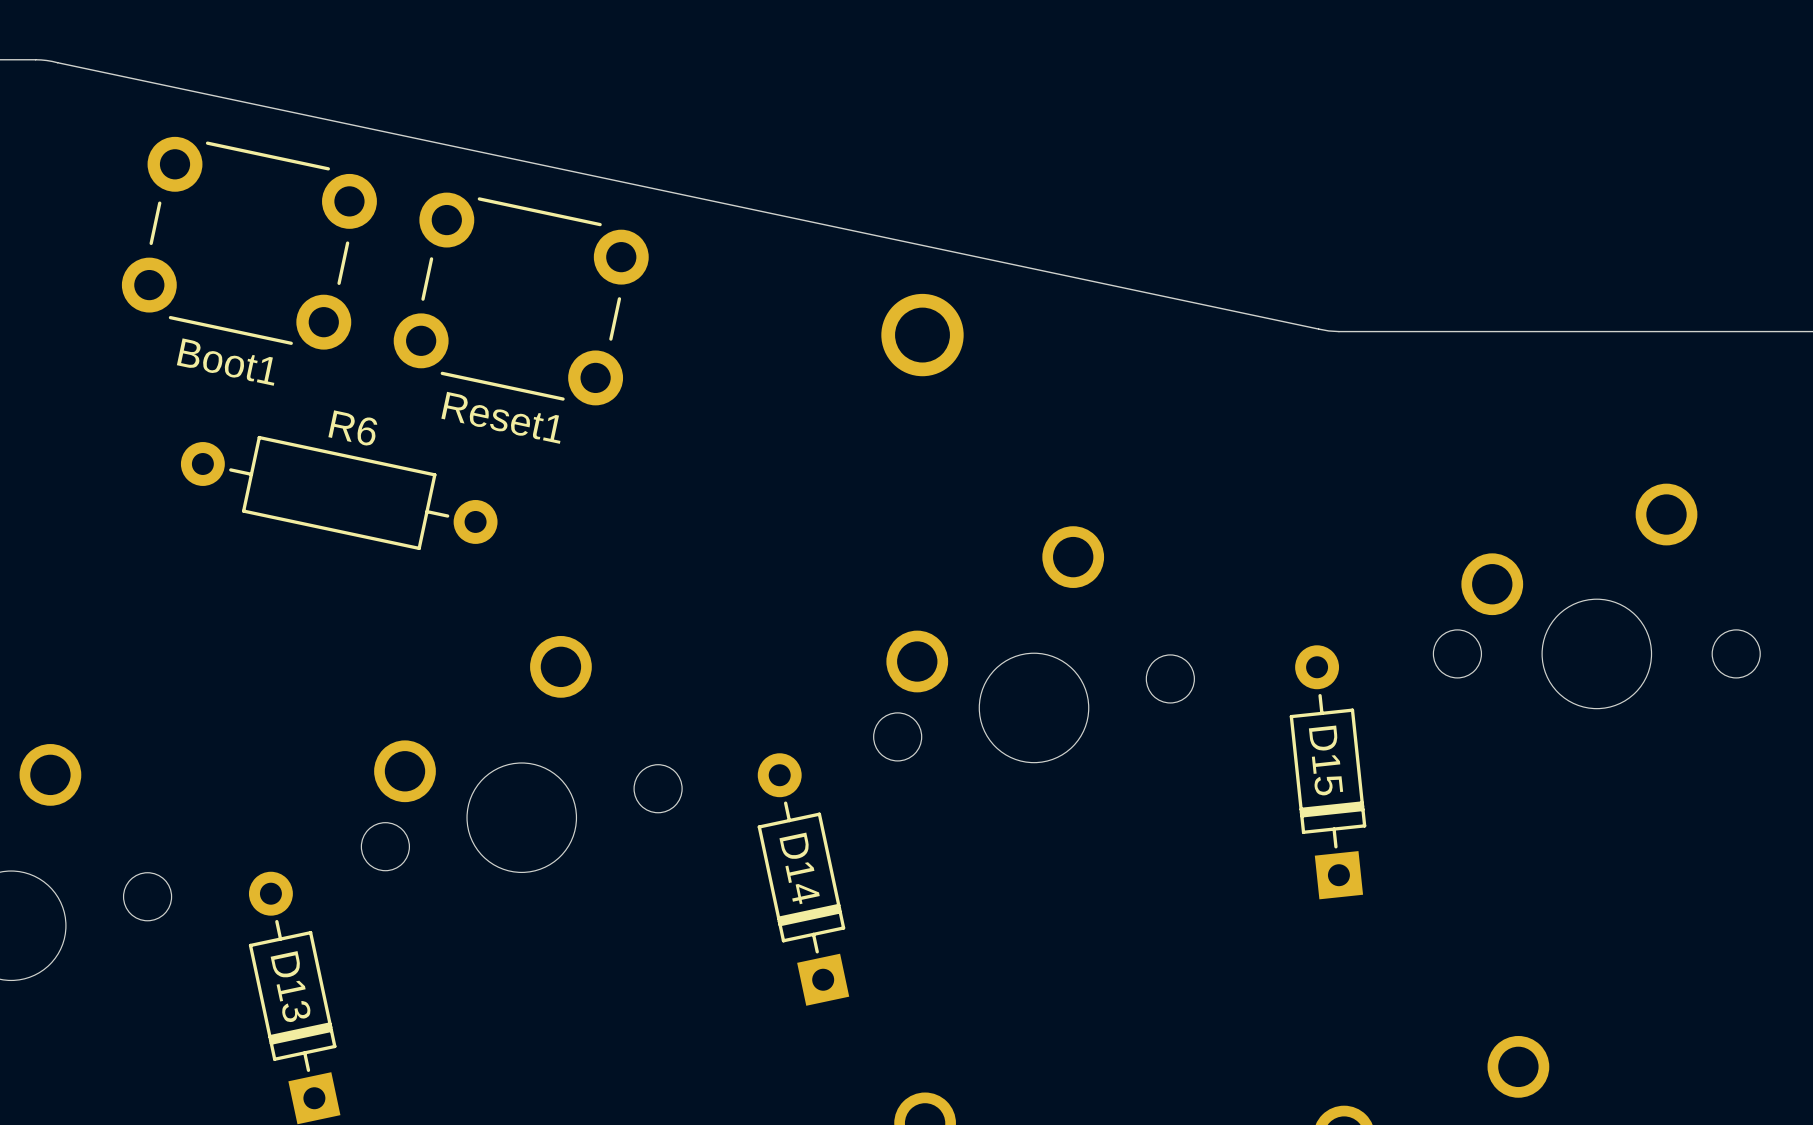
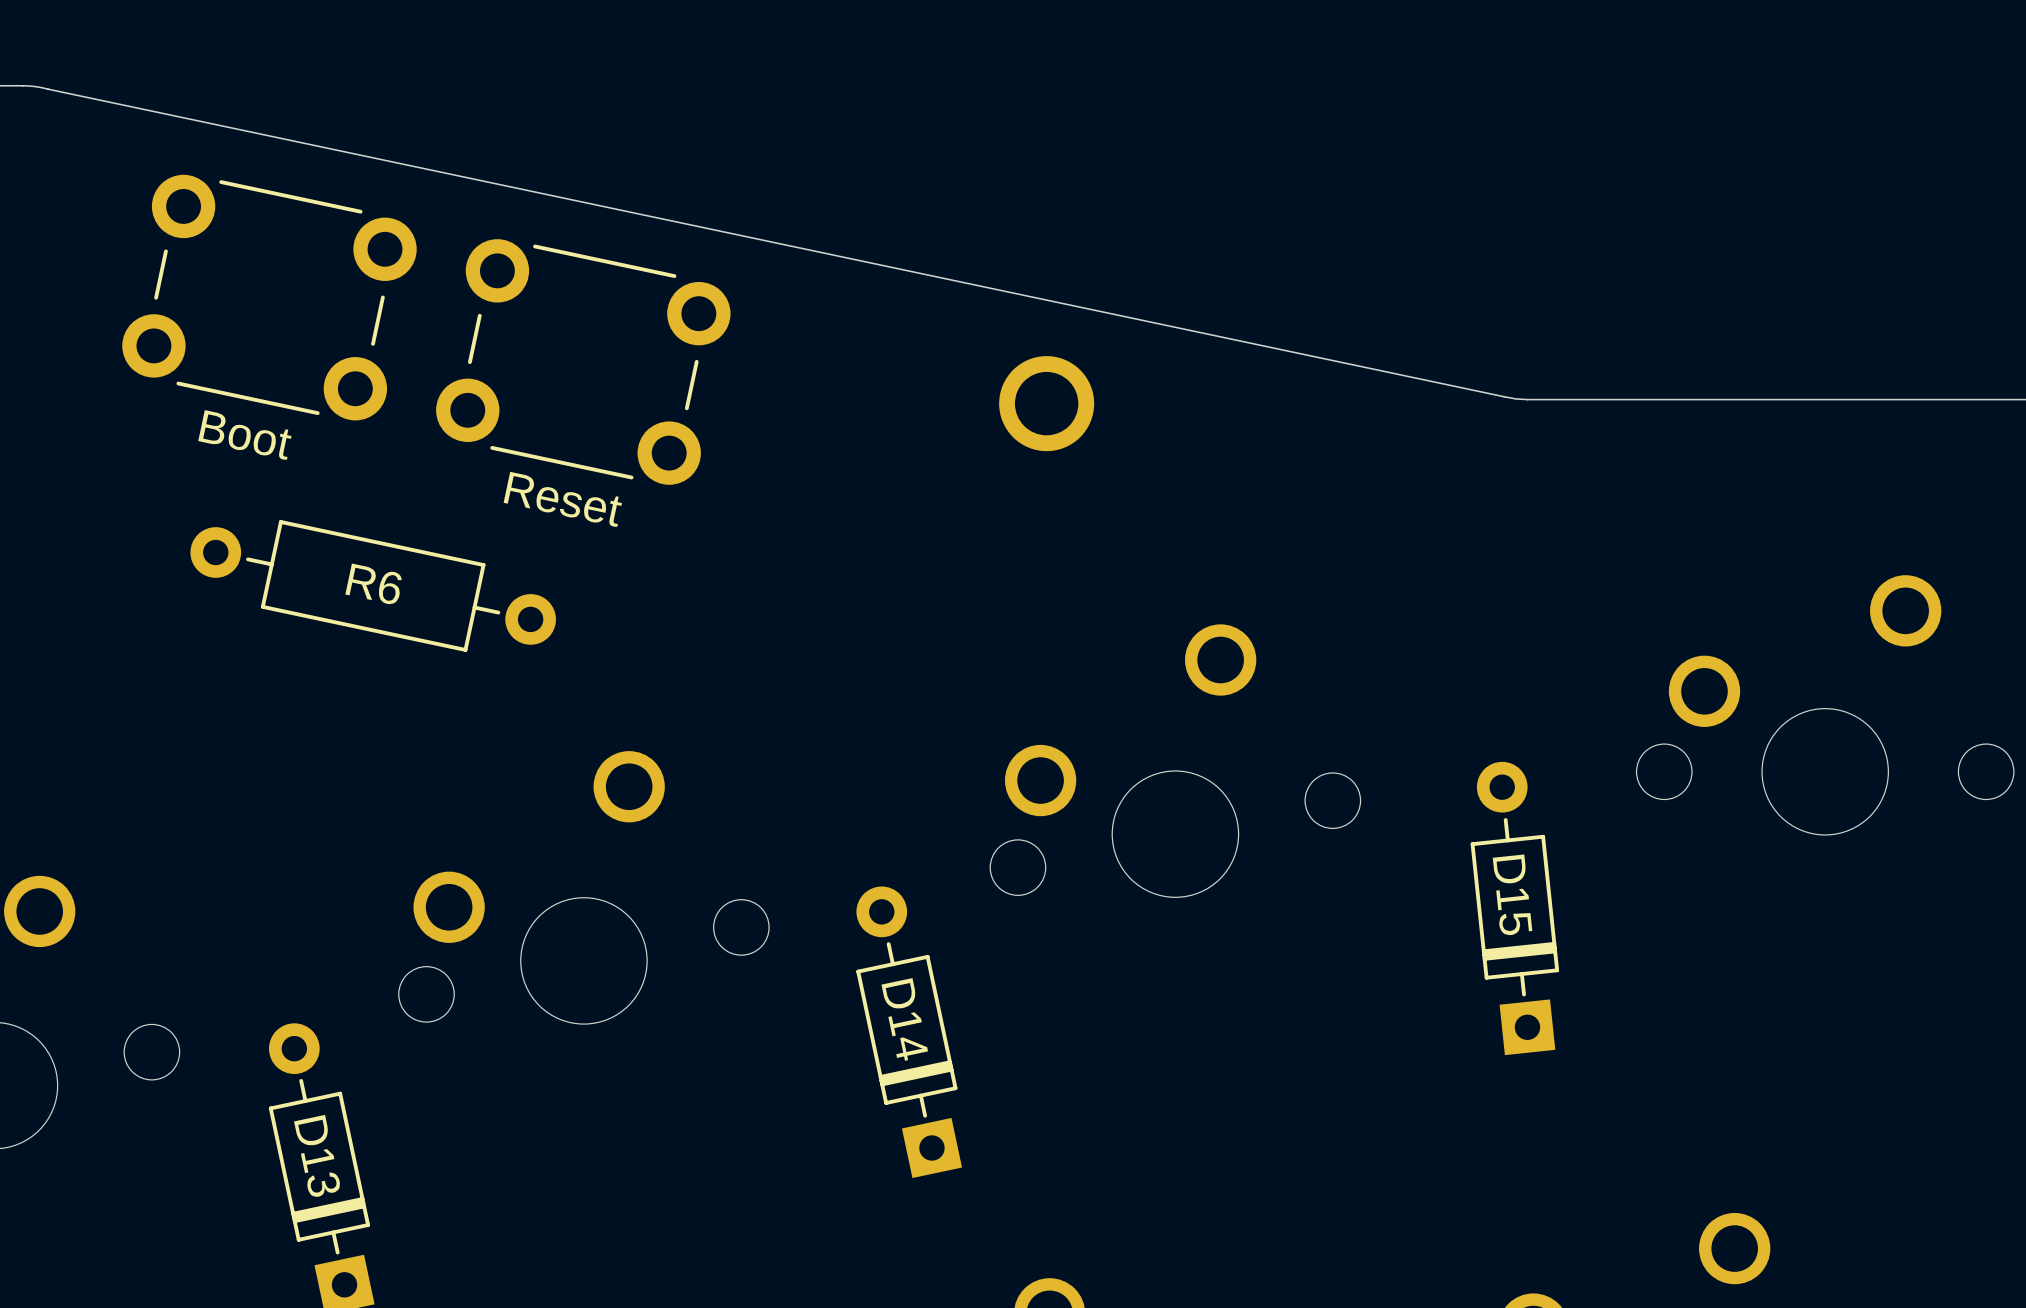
Boot1 name: Boot1 (225, 362) -> Boot (244, 434)
Reset1 name: Reset1 (500, 417) -> Reset (562, 499)
R6 name position: R6 (352, 428) -> R6 (373, 584)

